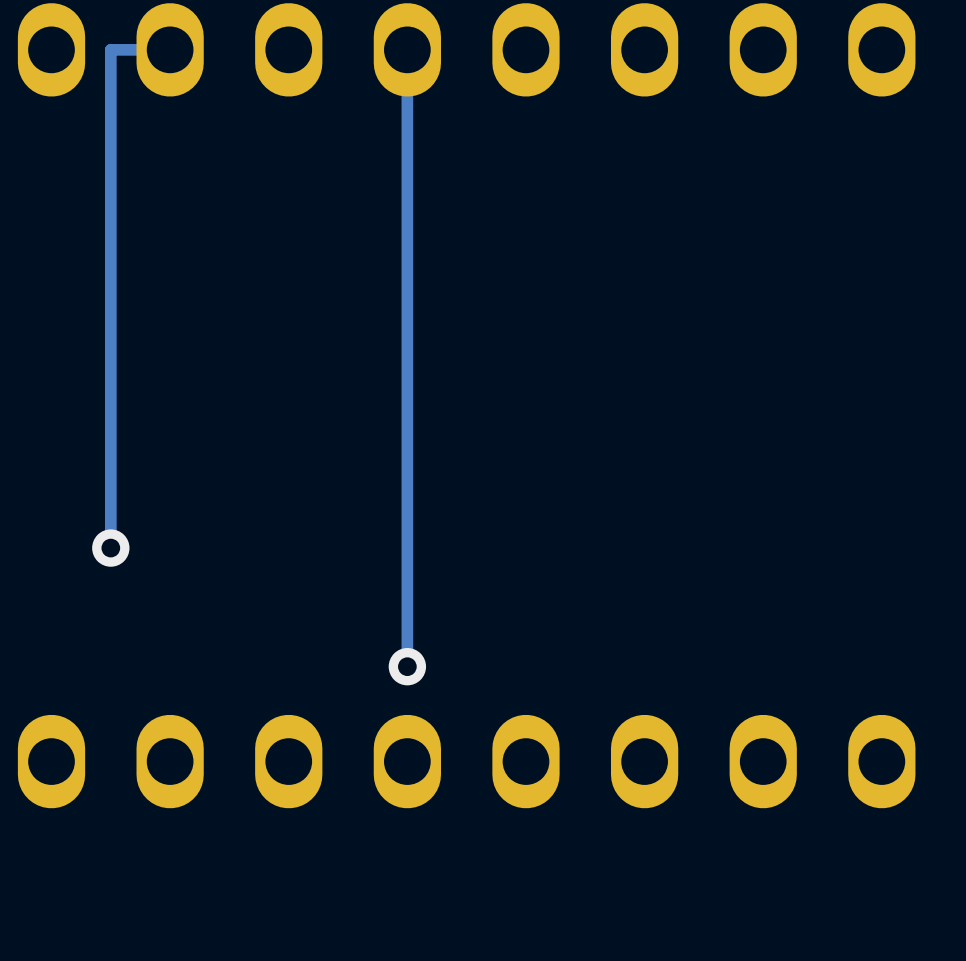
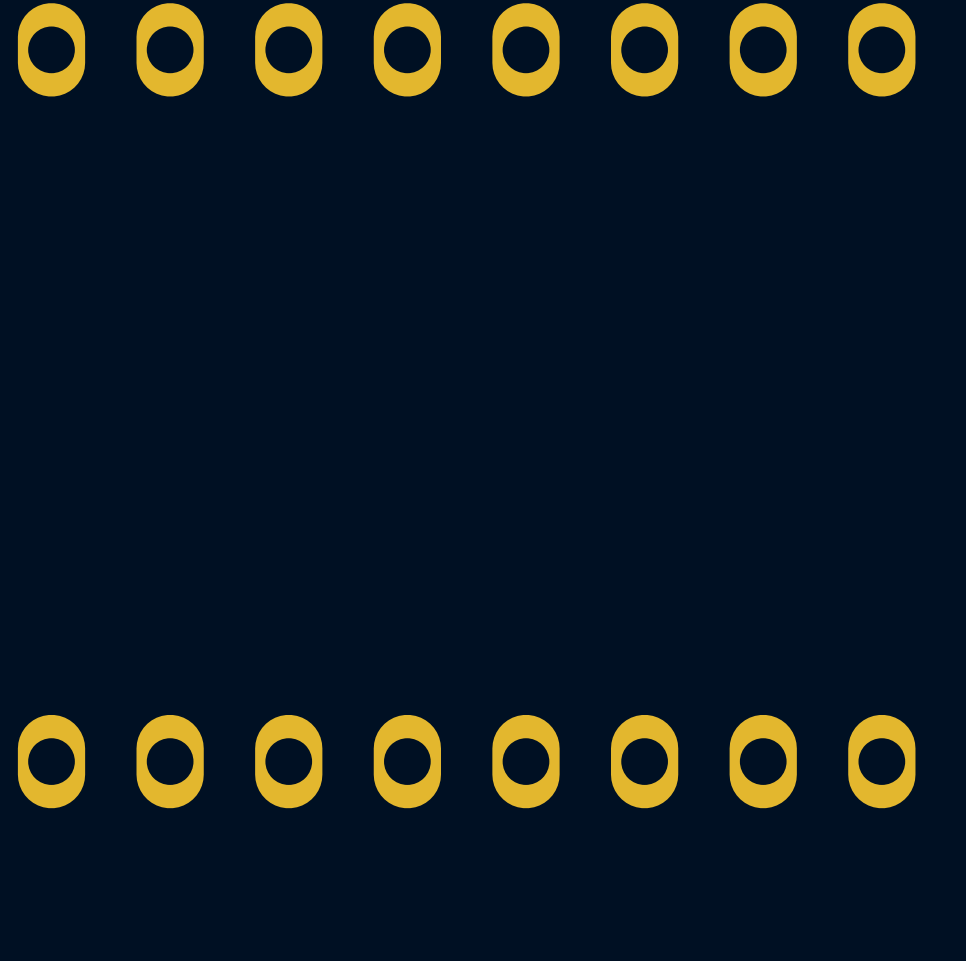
track: (170, 49) (110, 49) (110, 548) -> none
track: (407, 49) (407, 666) -> none
via: (110, 548) -> none
via: (407, 666) -> none

